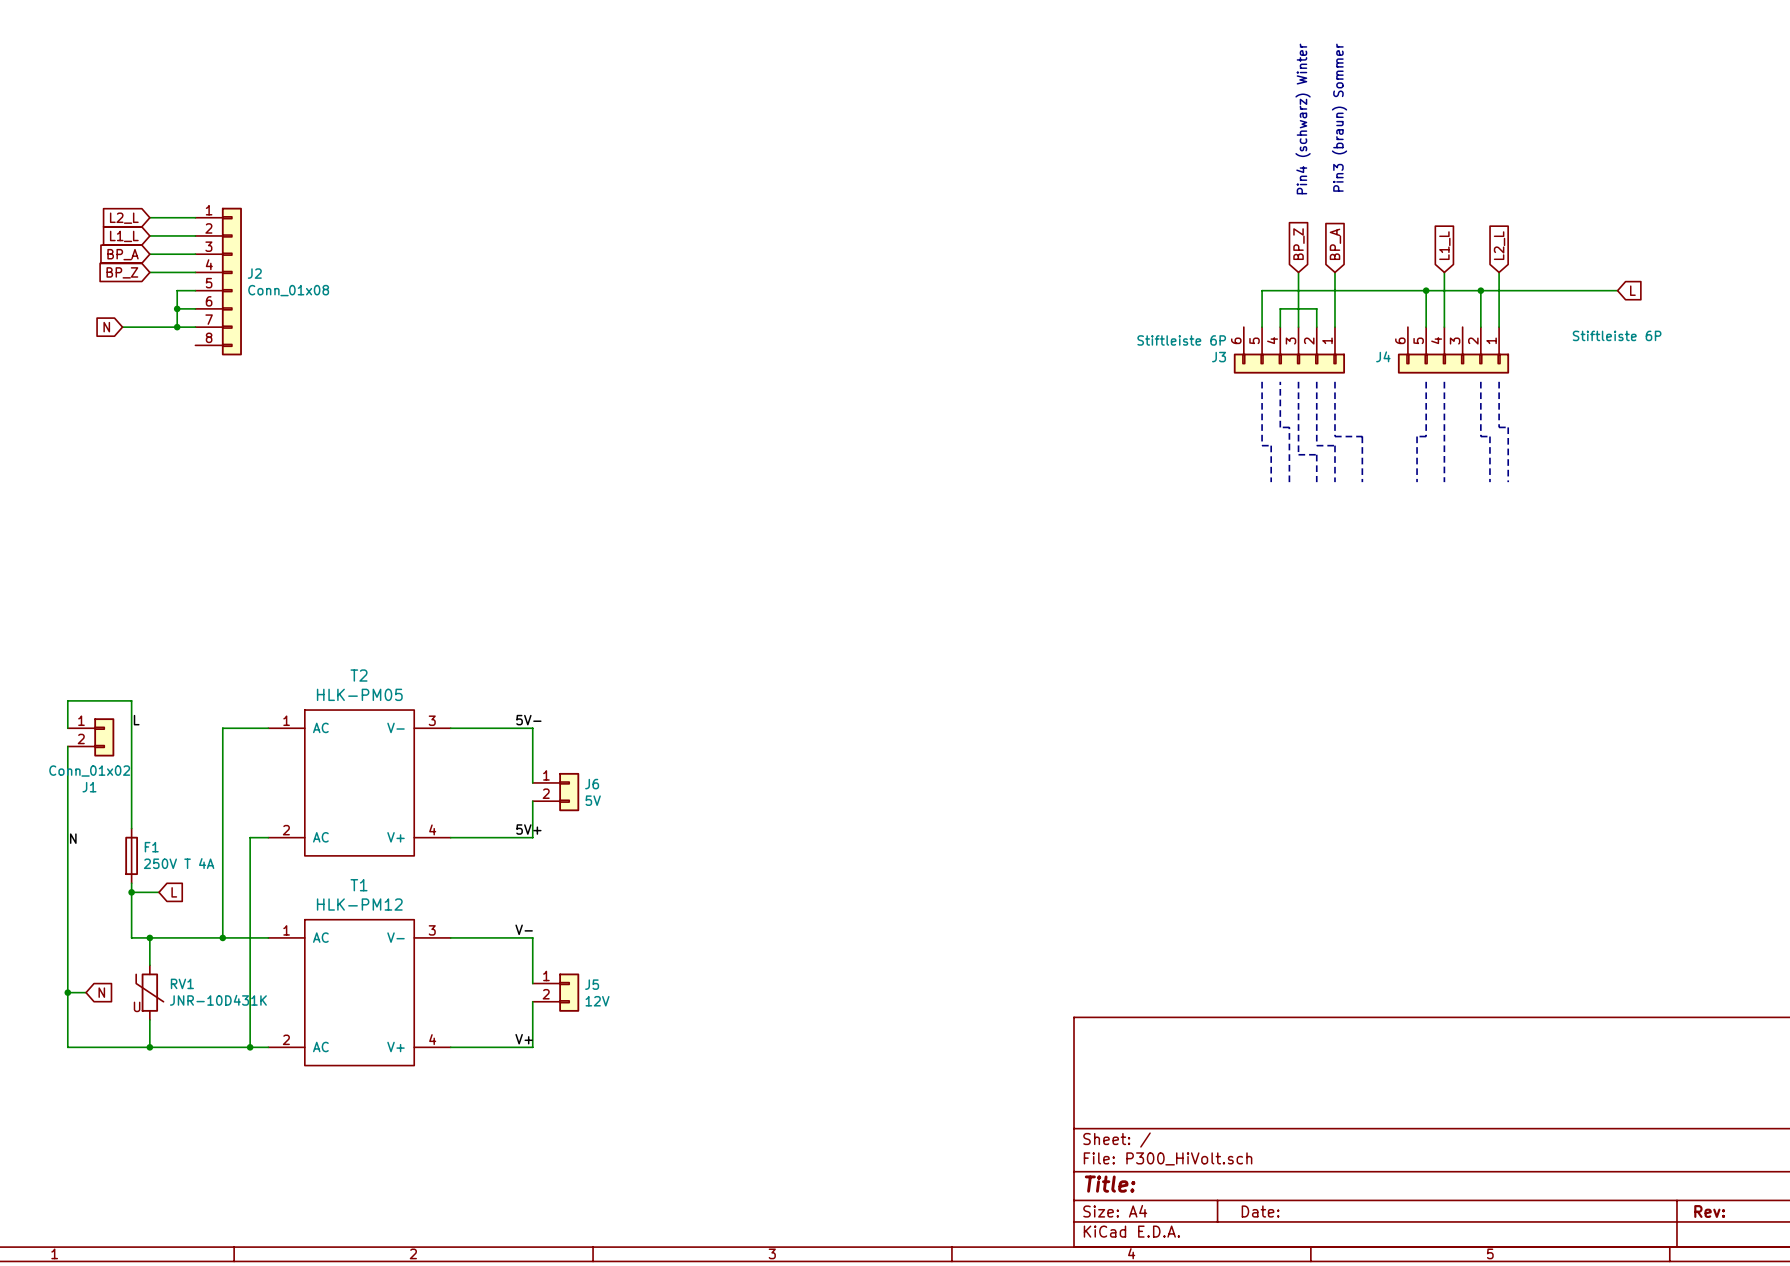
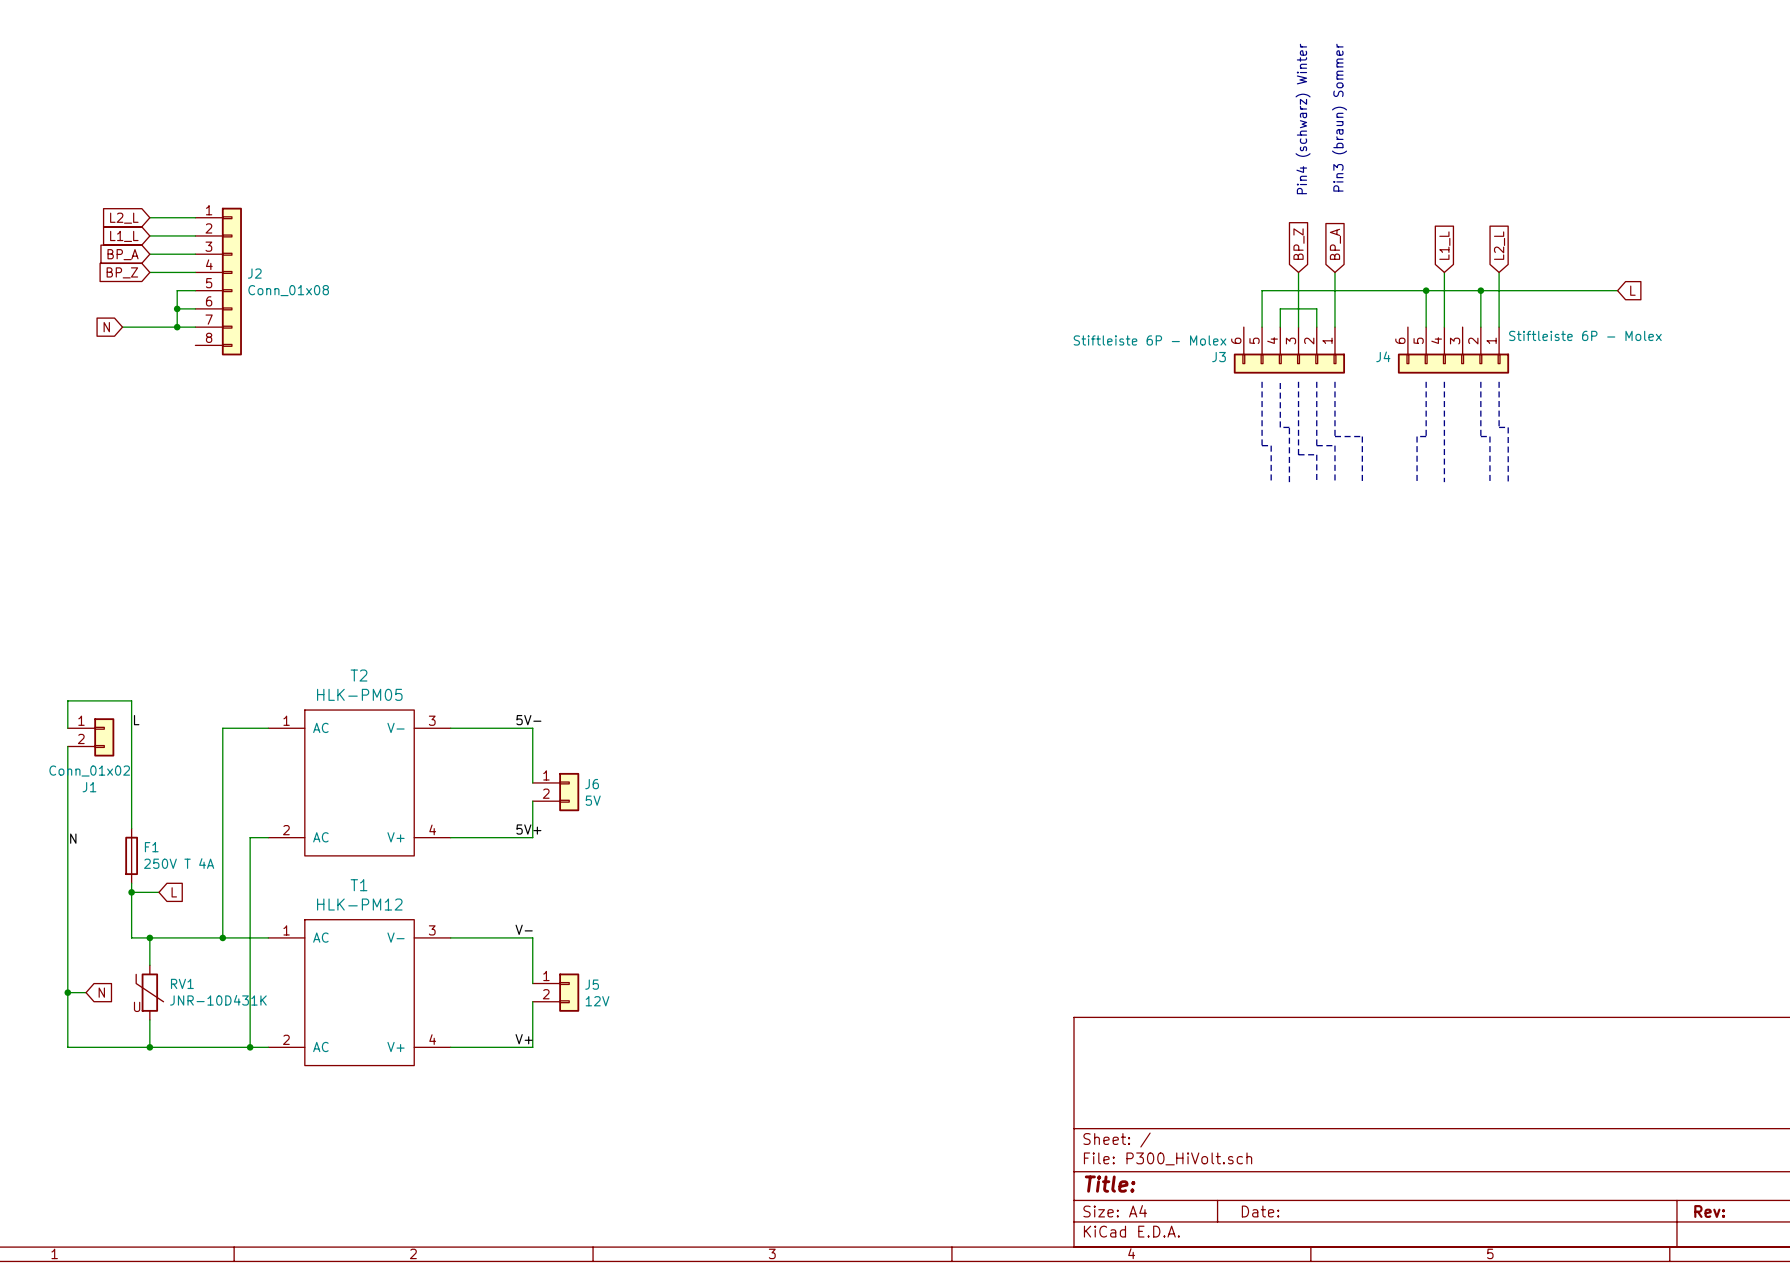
J4 value: Stiftleiste 6P (1617, 335) -> Stiftleiste 6P - Molex (1585, 335)
J3 value: Stiftleiste 6P (1181, 340) -> Stiftleiste 6P - Molex (1150, 340)

